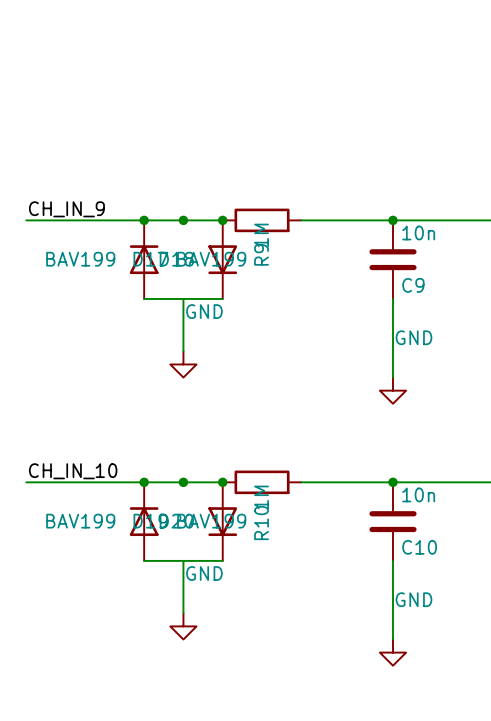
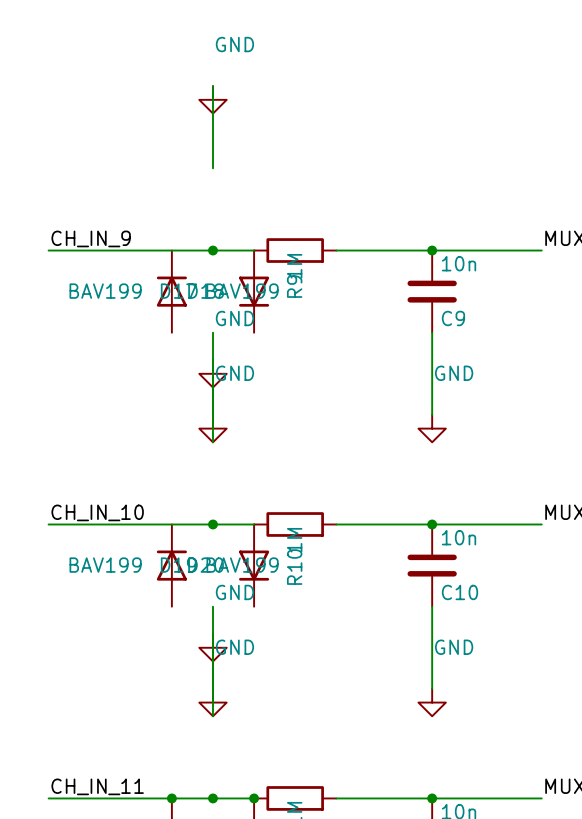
wire: none -> (212, 86) (212, 168)
power symbol: none -> GND (212, 99)
junction: (144, 220) -> none
junction: (222, 220) -> none
wire: (144, 298) (222, 298) -> none
power symbol: none -> GND (212, 373)
wire: none -> (212, 387) (212, 442)
power symbol: GND (183, 364) -> none
power symbol: none -> GND (212, 428)
junction: (144, 482) -> none
junction: (222, 482) -> none
wire: (144, 560) (222, 560) -> none
power symbol: none -> GND (212, 647)
wire: none -> (212, 661) (212, 716)
power symbol: GND (183, 626) -> none
power symbol: none -> GND (212, 702)

